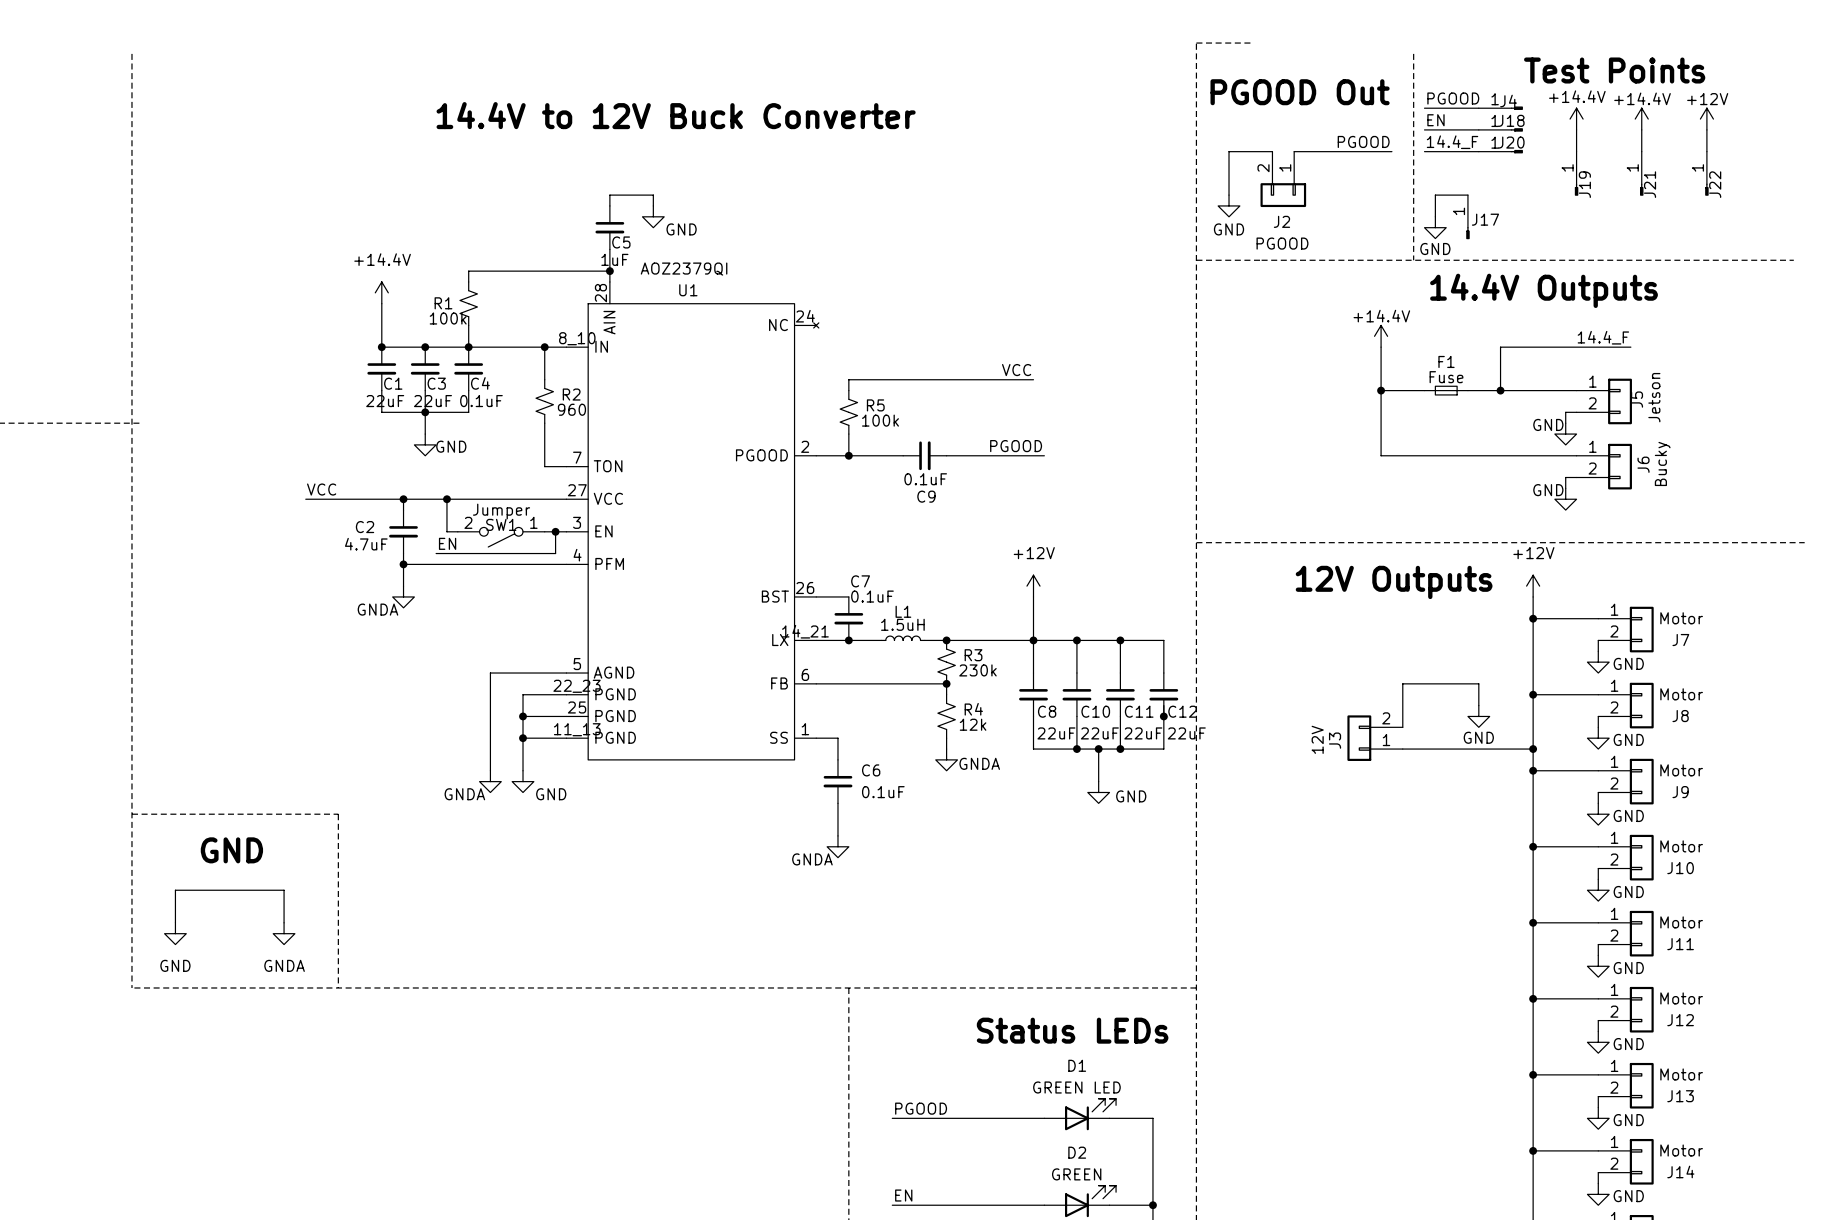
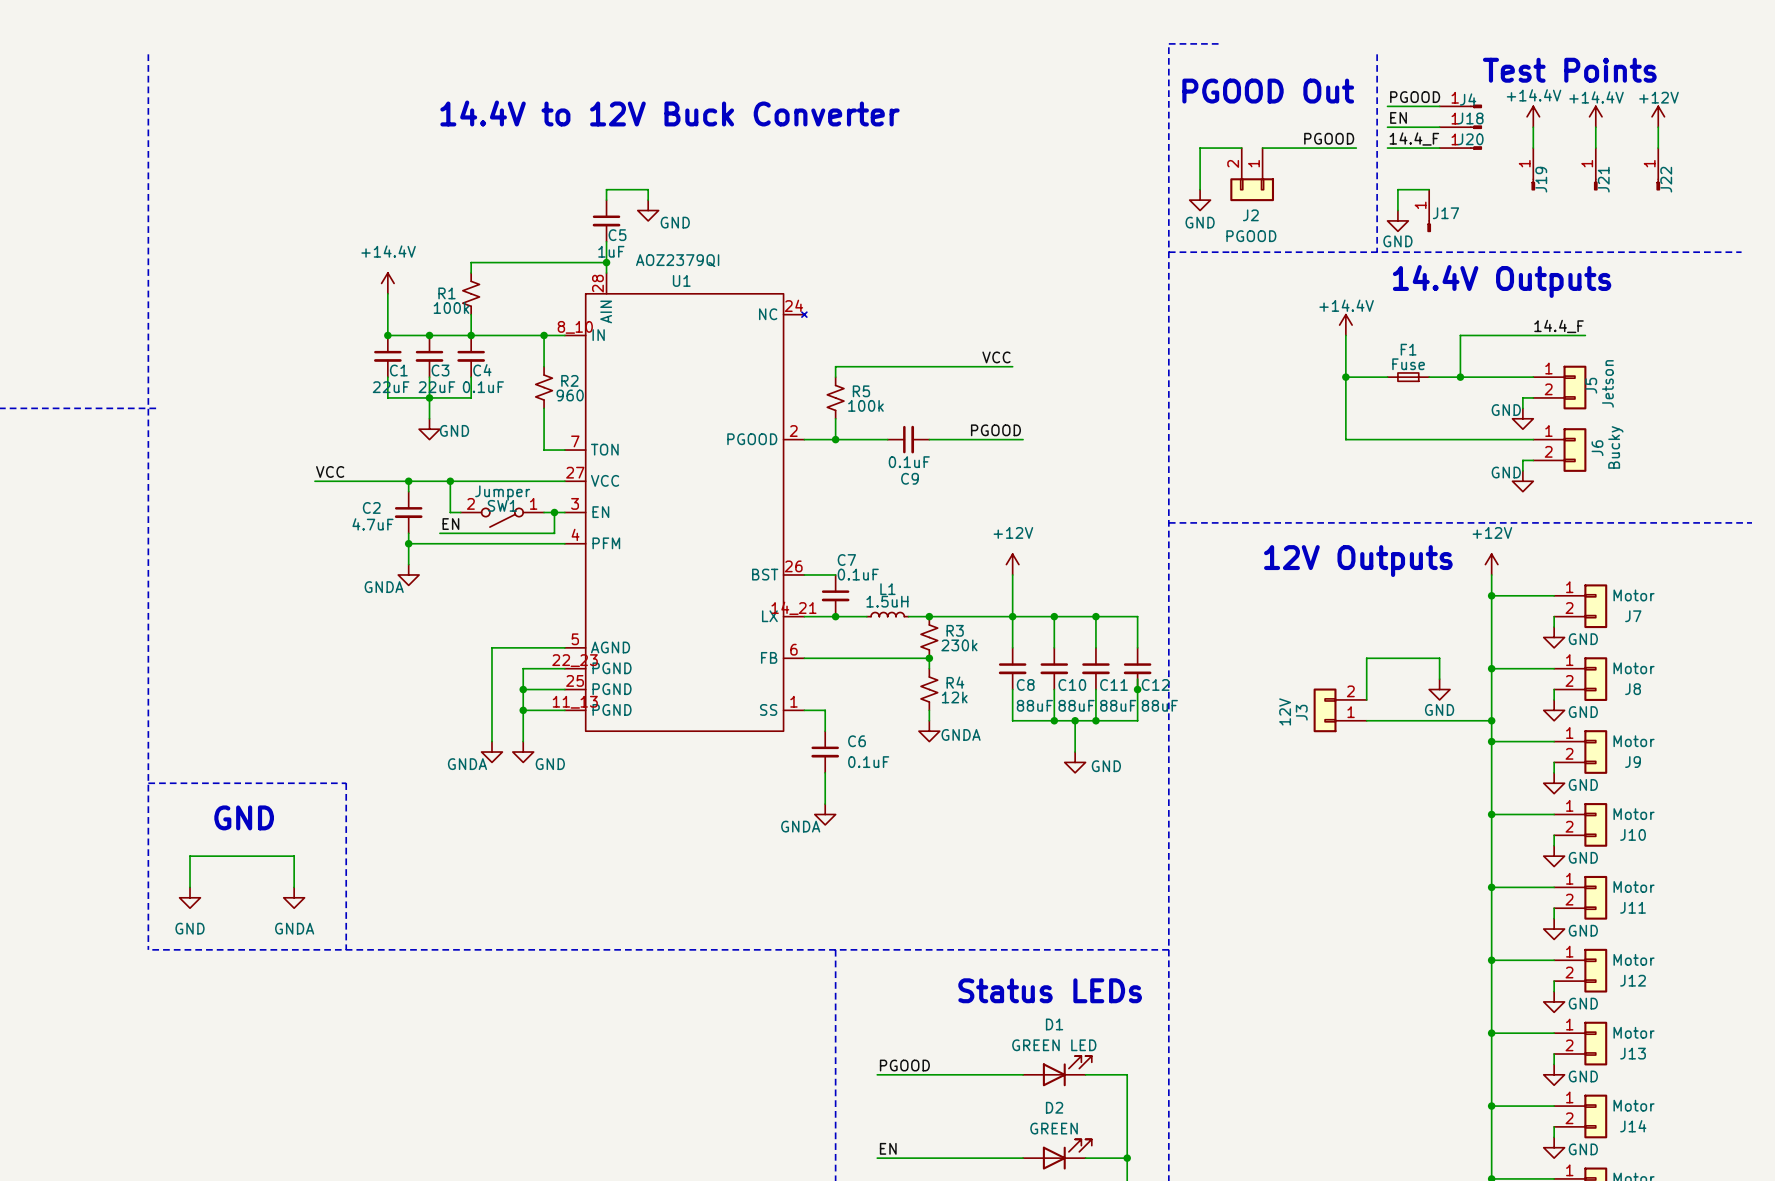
C8 value: 22uF (1056, 733) -> 88uF (1034, 705)
C10 value: 22uF (1099, 733) -> 88uF (1076, 705)
C11 value: 22uF (1143, 733) -> 88uF (1118, 705)
C12 value: 22uF (1186, 733) -> 88uF (1159, 705)

